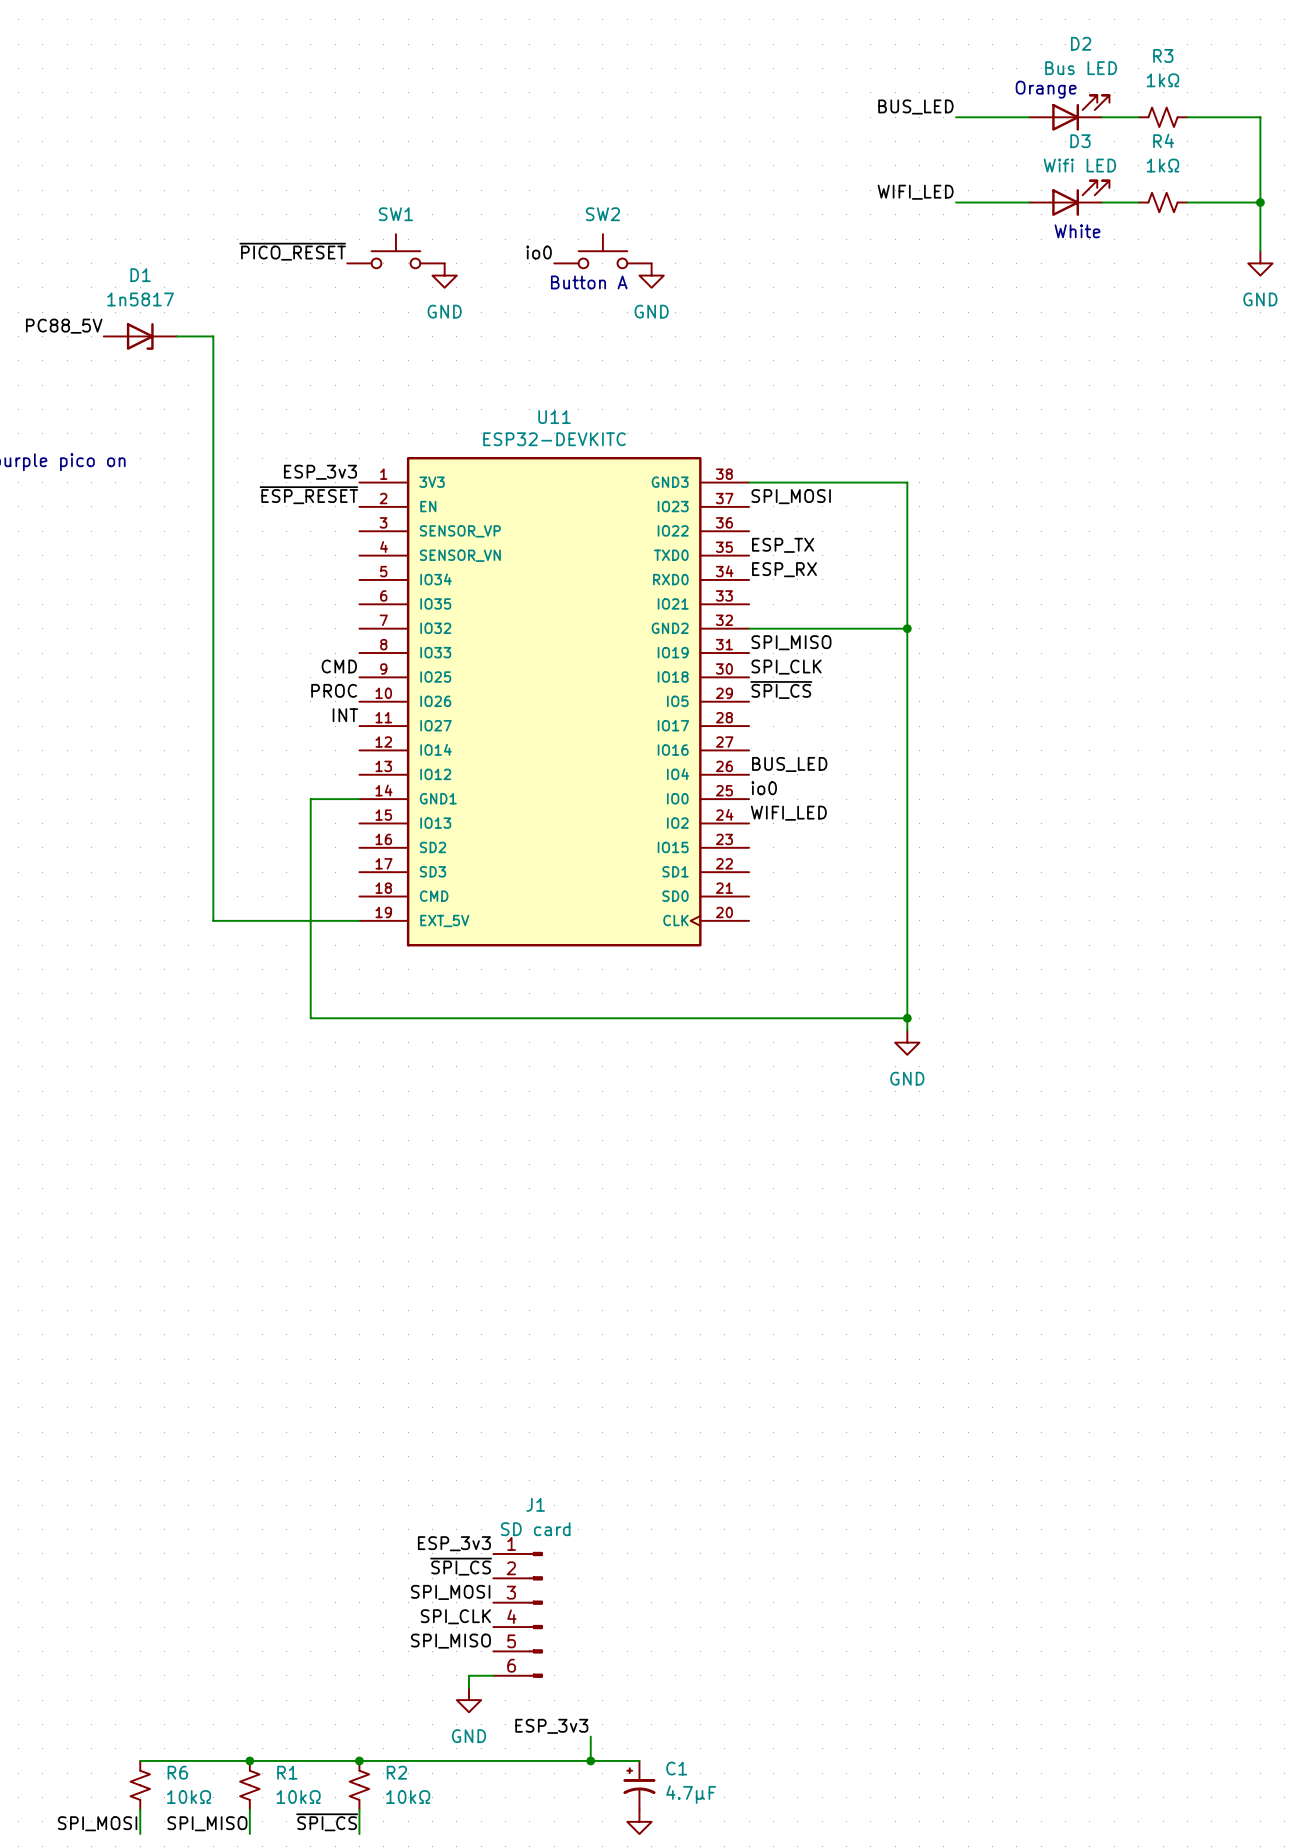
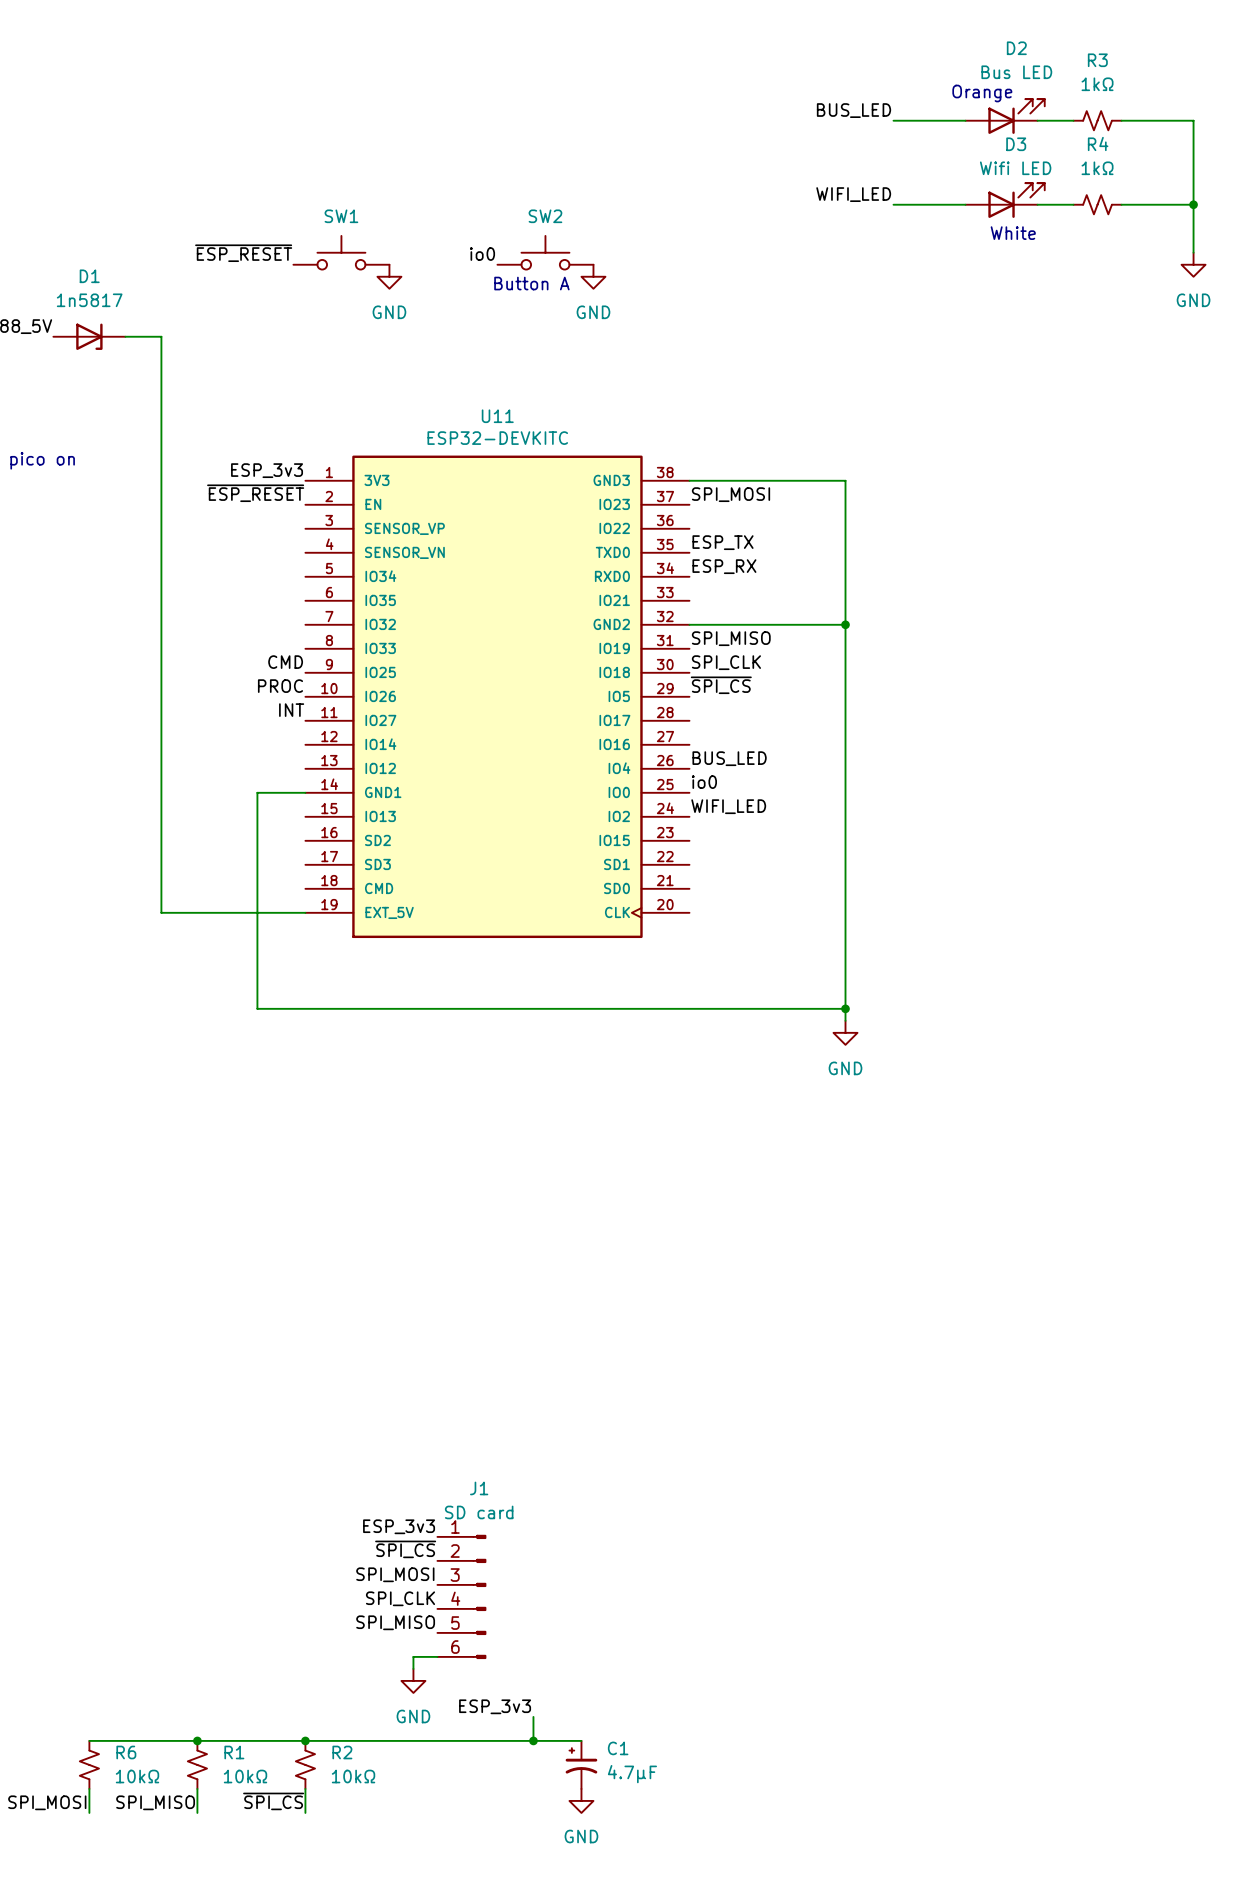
label: ~{PICO_RESET} (292, 251) -> ~{ESP_RESET} (243, 253)

